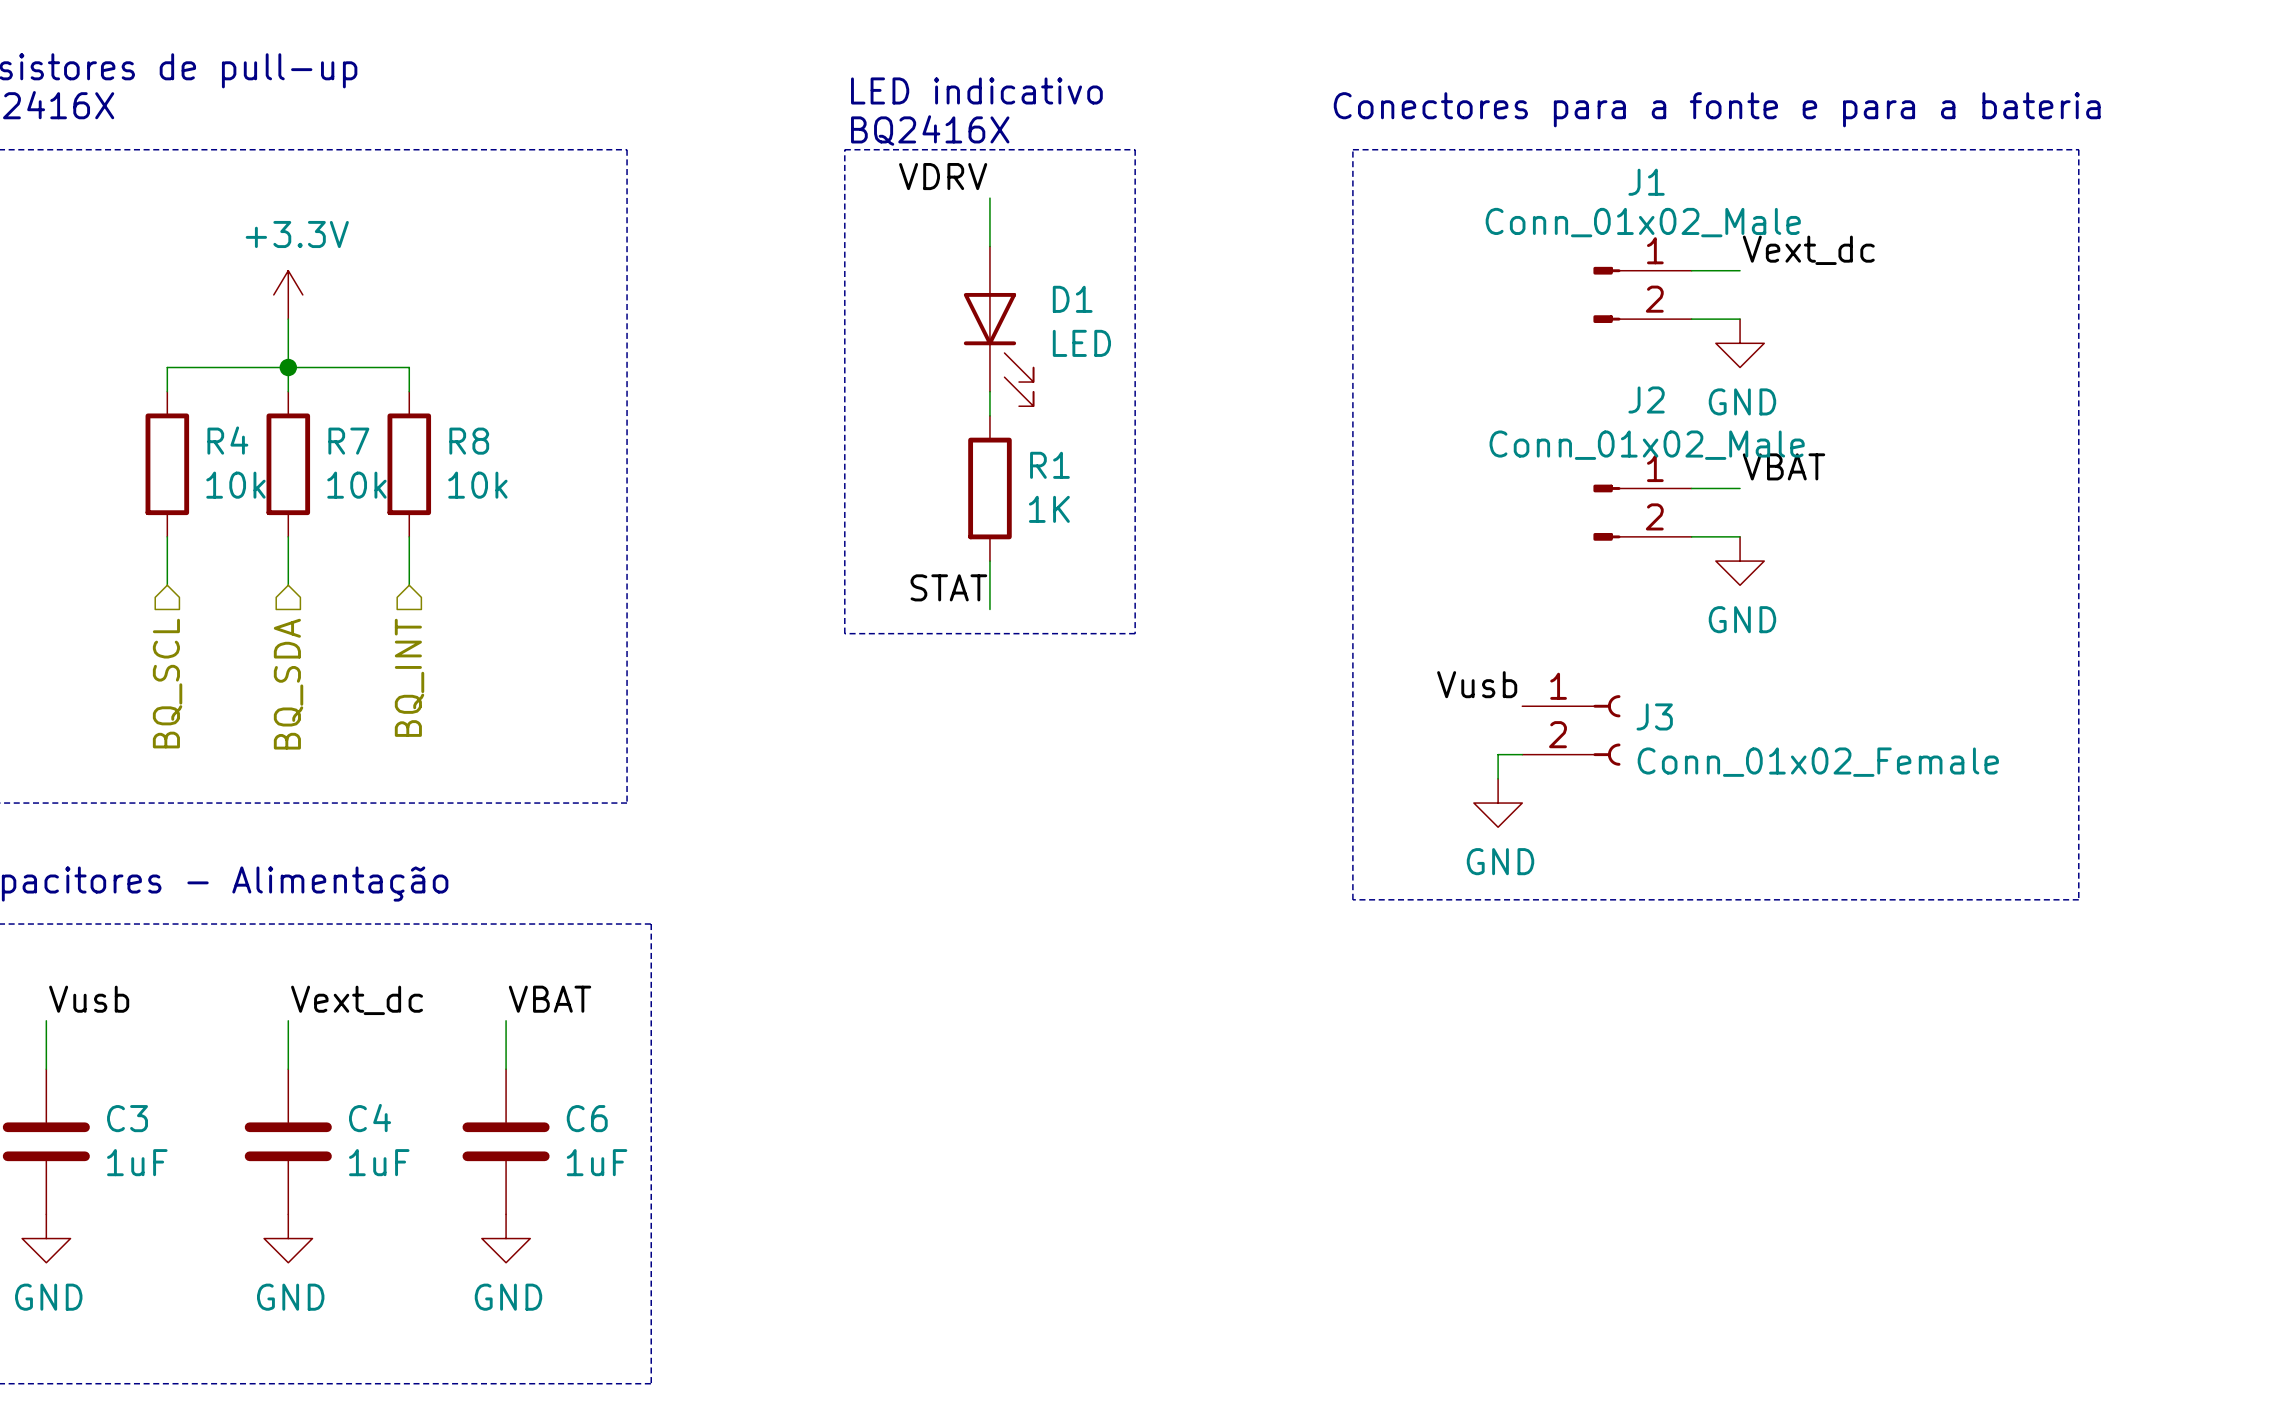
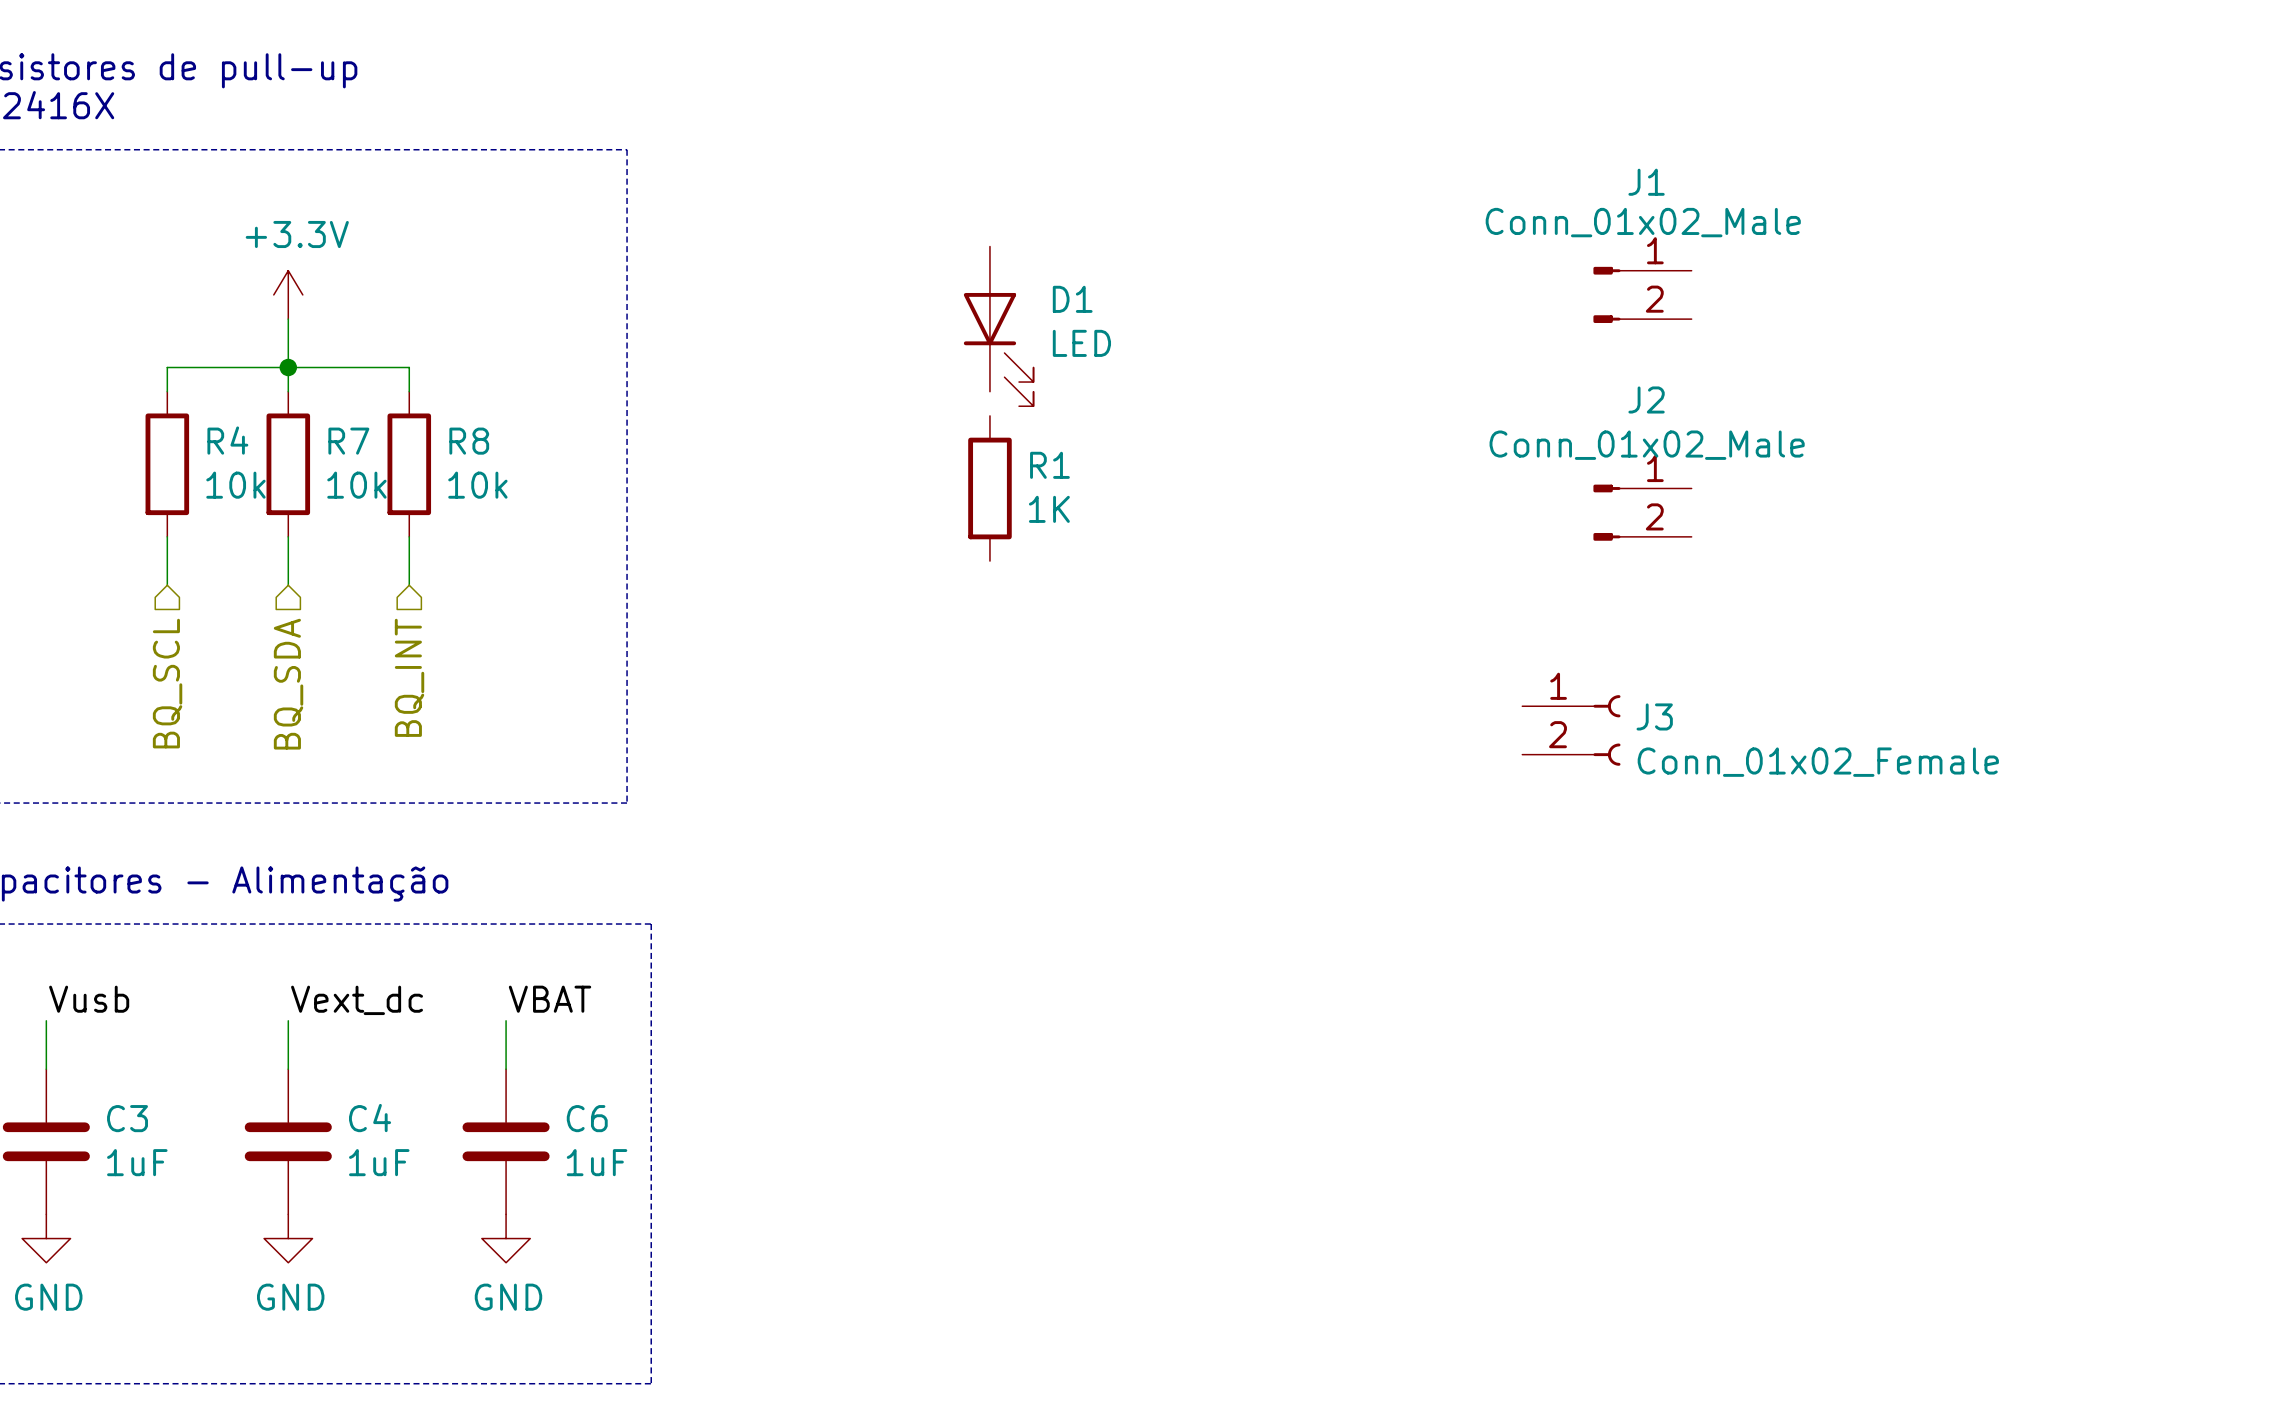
text: LED indicativo (976, 90) -> none
text: Conectores para a fonte e para a bateria (1717, 109) -> none
text: BQ2416X (930, 130) -> none
line: (844, 149) (1135, 149) (1135, 633) (844, 633) (844, 149) -> none
line: (1352, 149) (2078, 149) (2078, 899) (1352, 899) (1352, 149) -> none
label: VDRV (943, 176) -> none
wire: (989, 198) (989, 246) -> none
label: Vext_dc (1808, 250) -> none
wire: (1691, 270) (1740, 270) -> none
wire: (1691, 319) (1740, 319) -> none
power symbol: GND (1740, 343) -> none
wire: (989, 391) (989, 415) -> none
label: VBAT (1784, 466) -> none
wire: (1691, 488) (1740, 488) -> none
wire: (1691, 536) (1740, 536) -> none
wire: (989, 561) (989, 609) -> none
power symbol: GND (1740, 561) -> none
label: STAT (948, 587) -> none
label: Vusb (1477, 684) -> none
wire: (1522, 754) (1498, 754) (1498, 778) -> none
power symbol: GND (1498, 803) -> none

